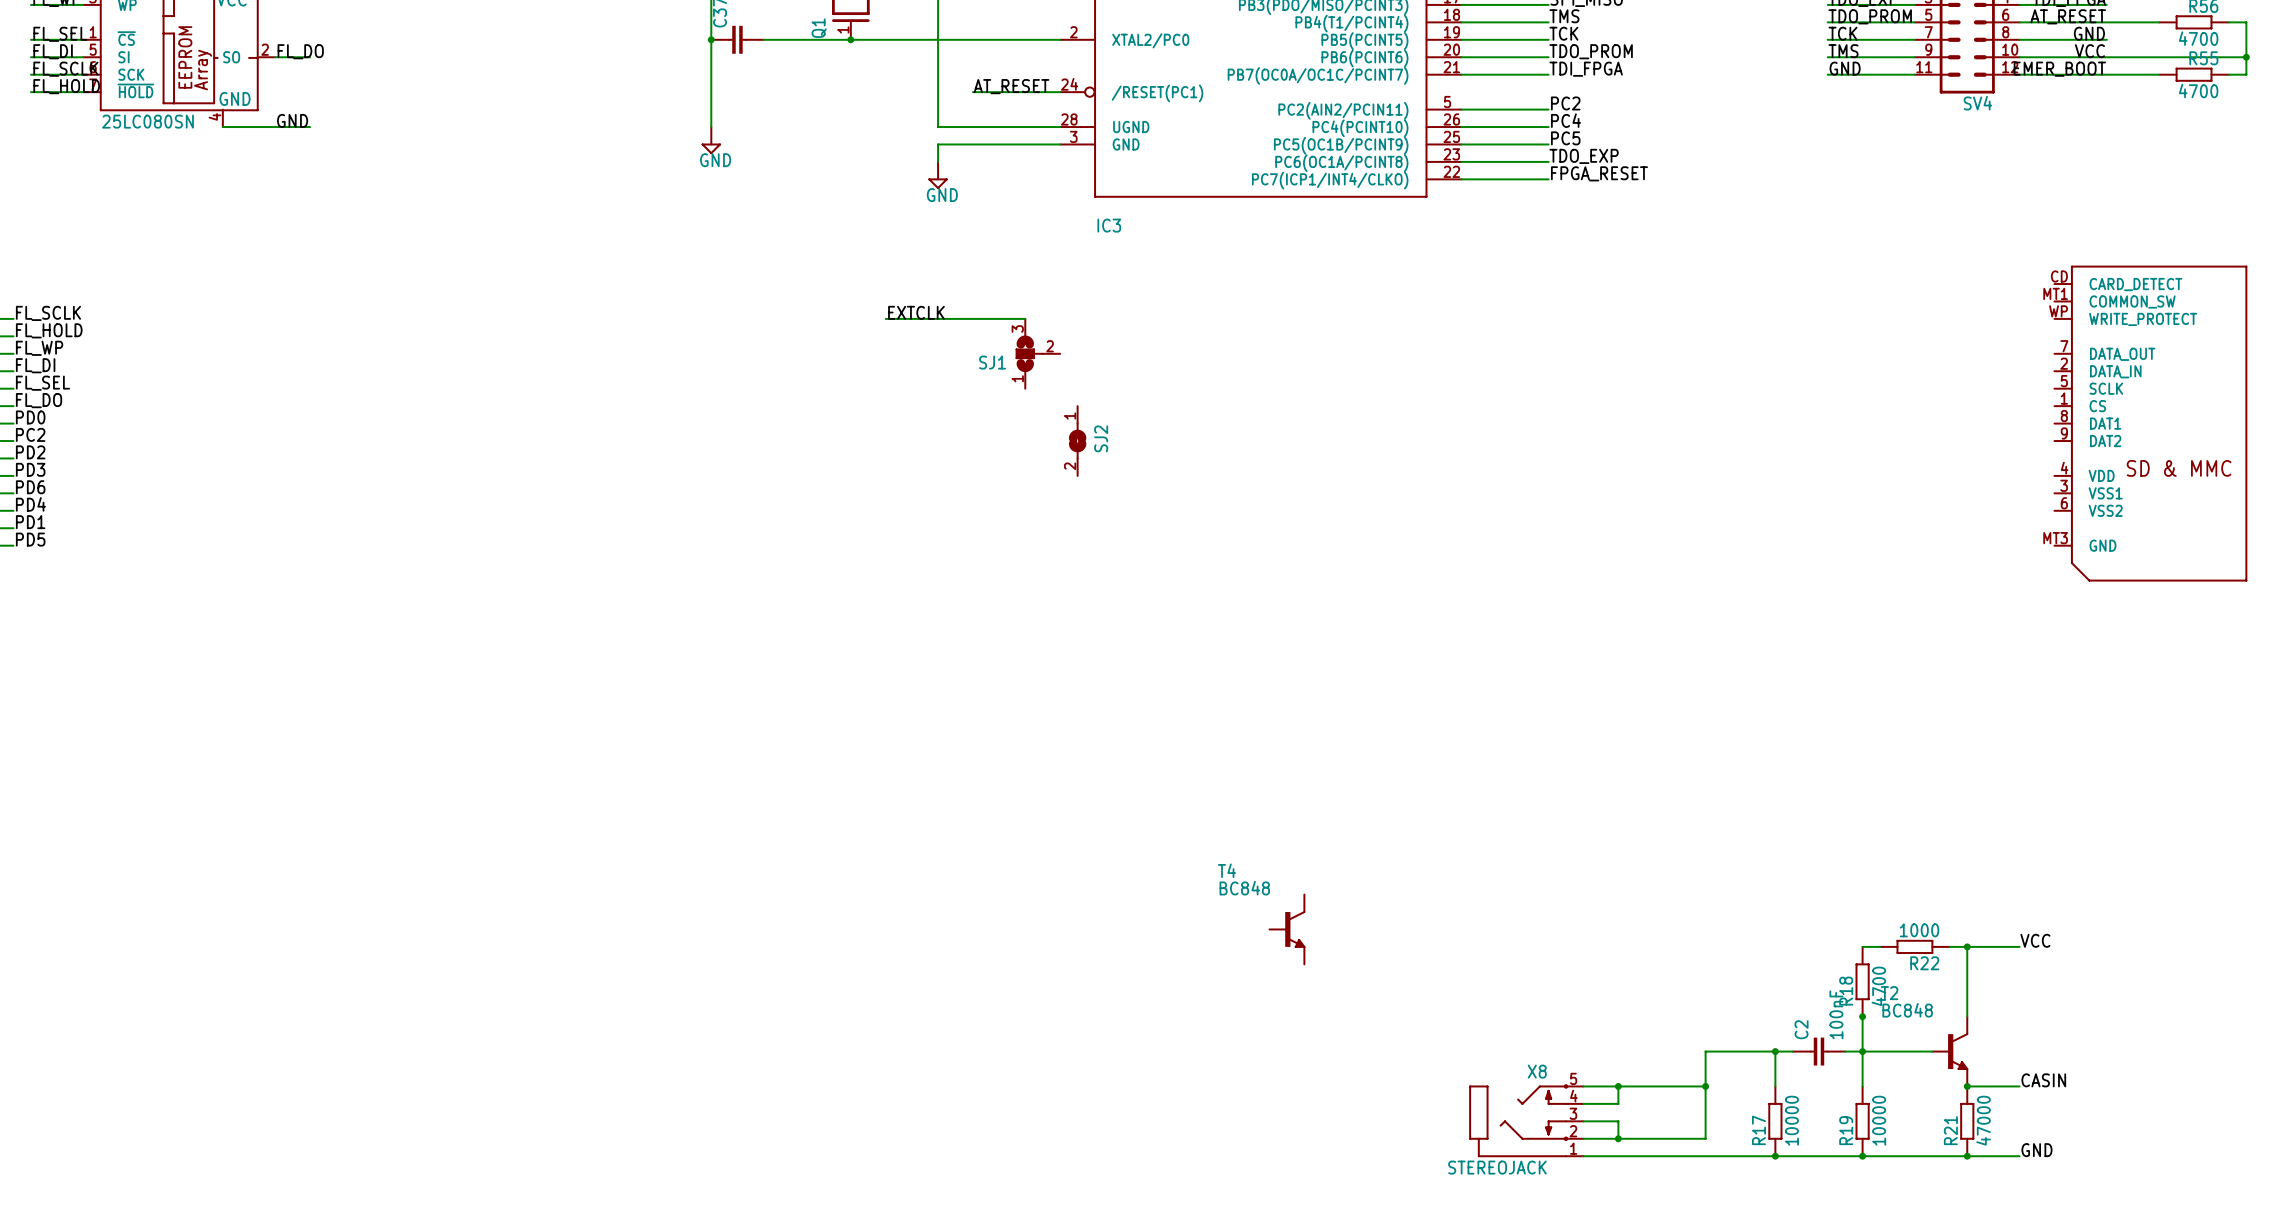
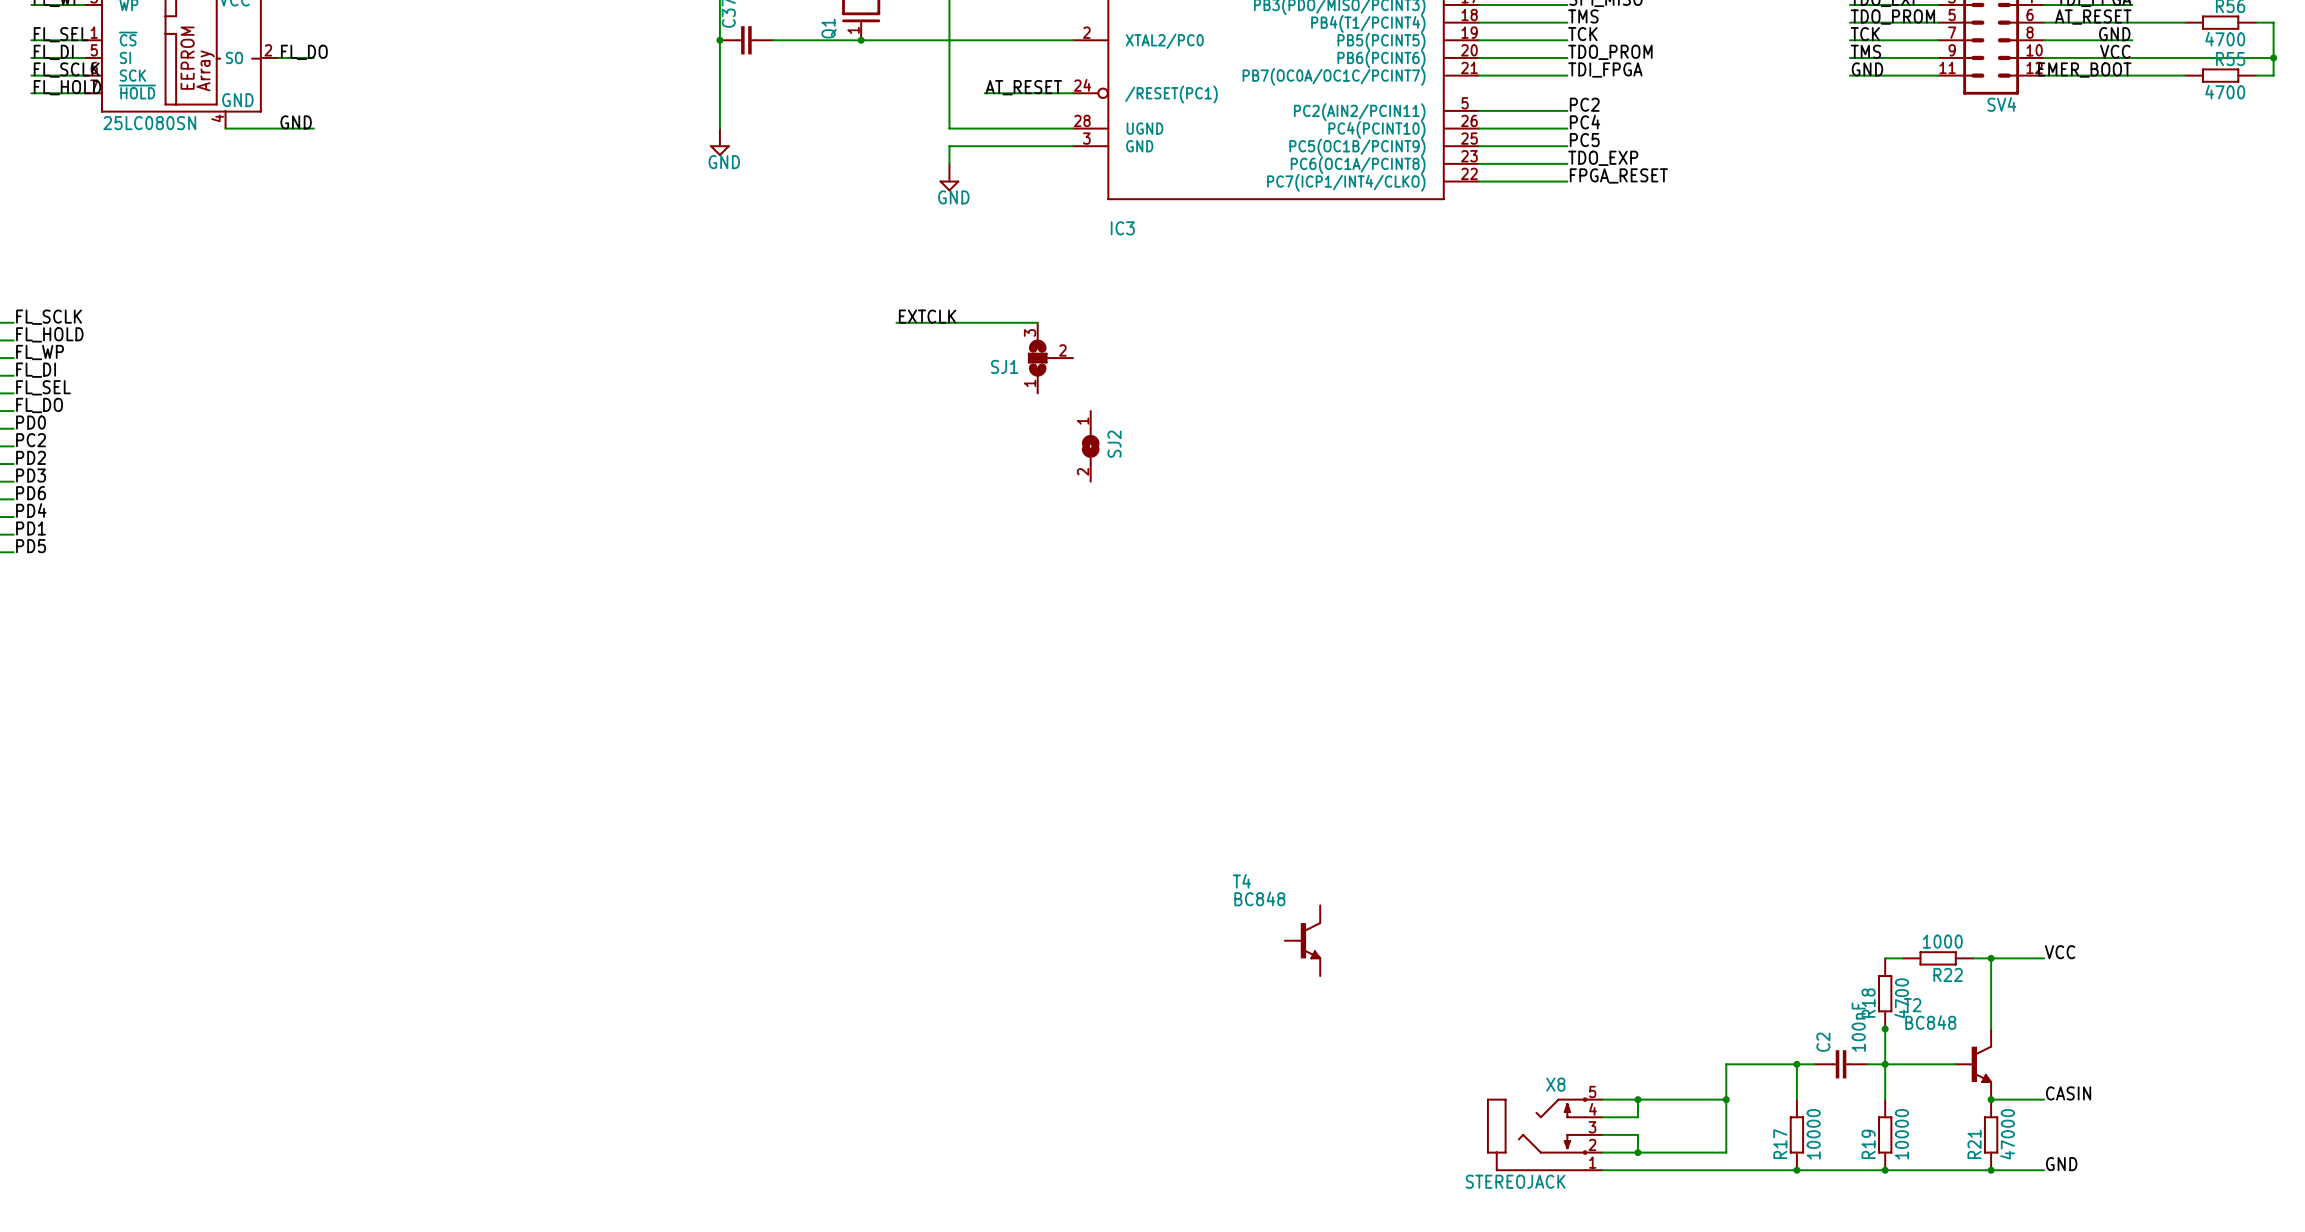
part: (2150, 423) -> none

